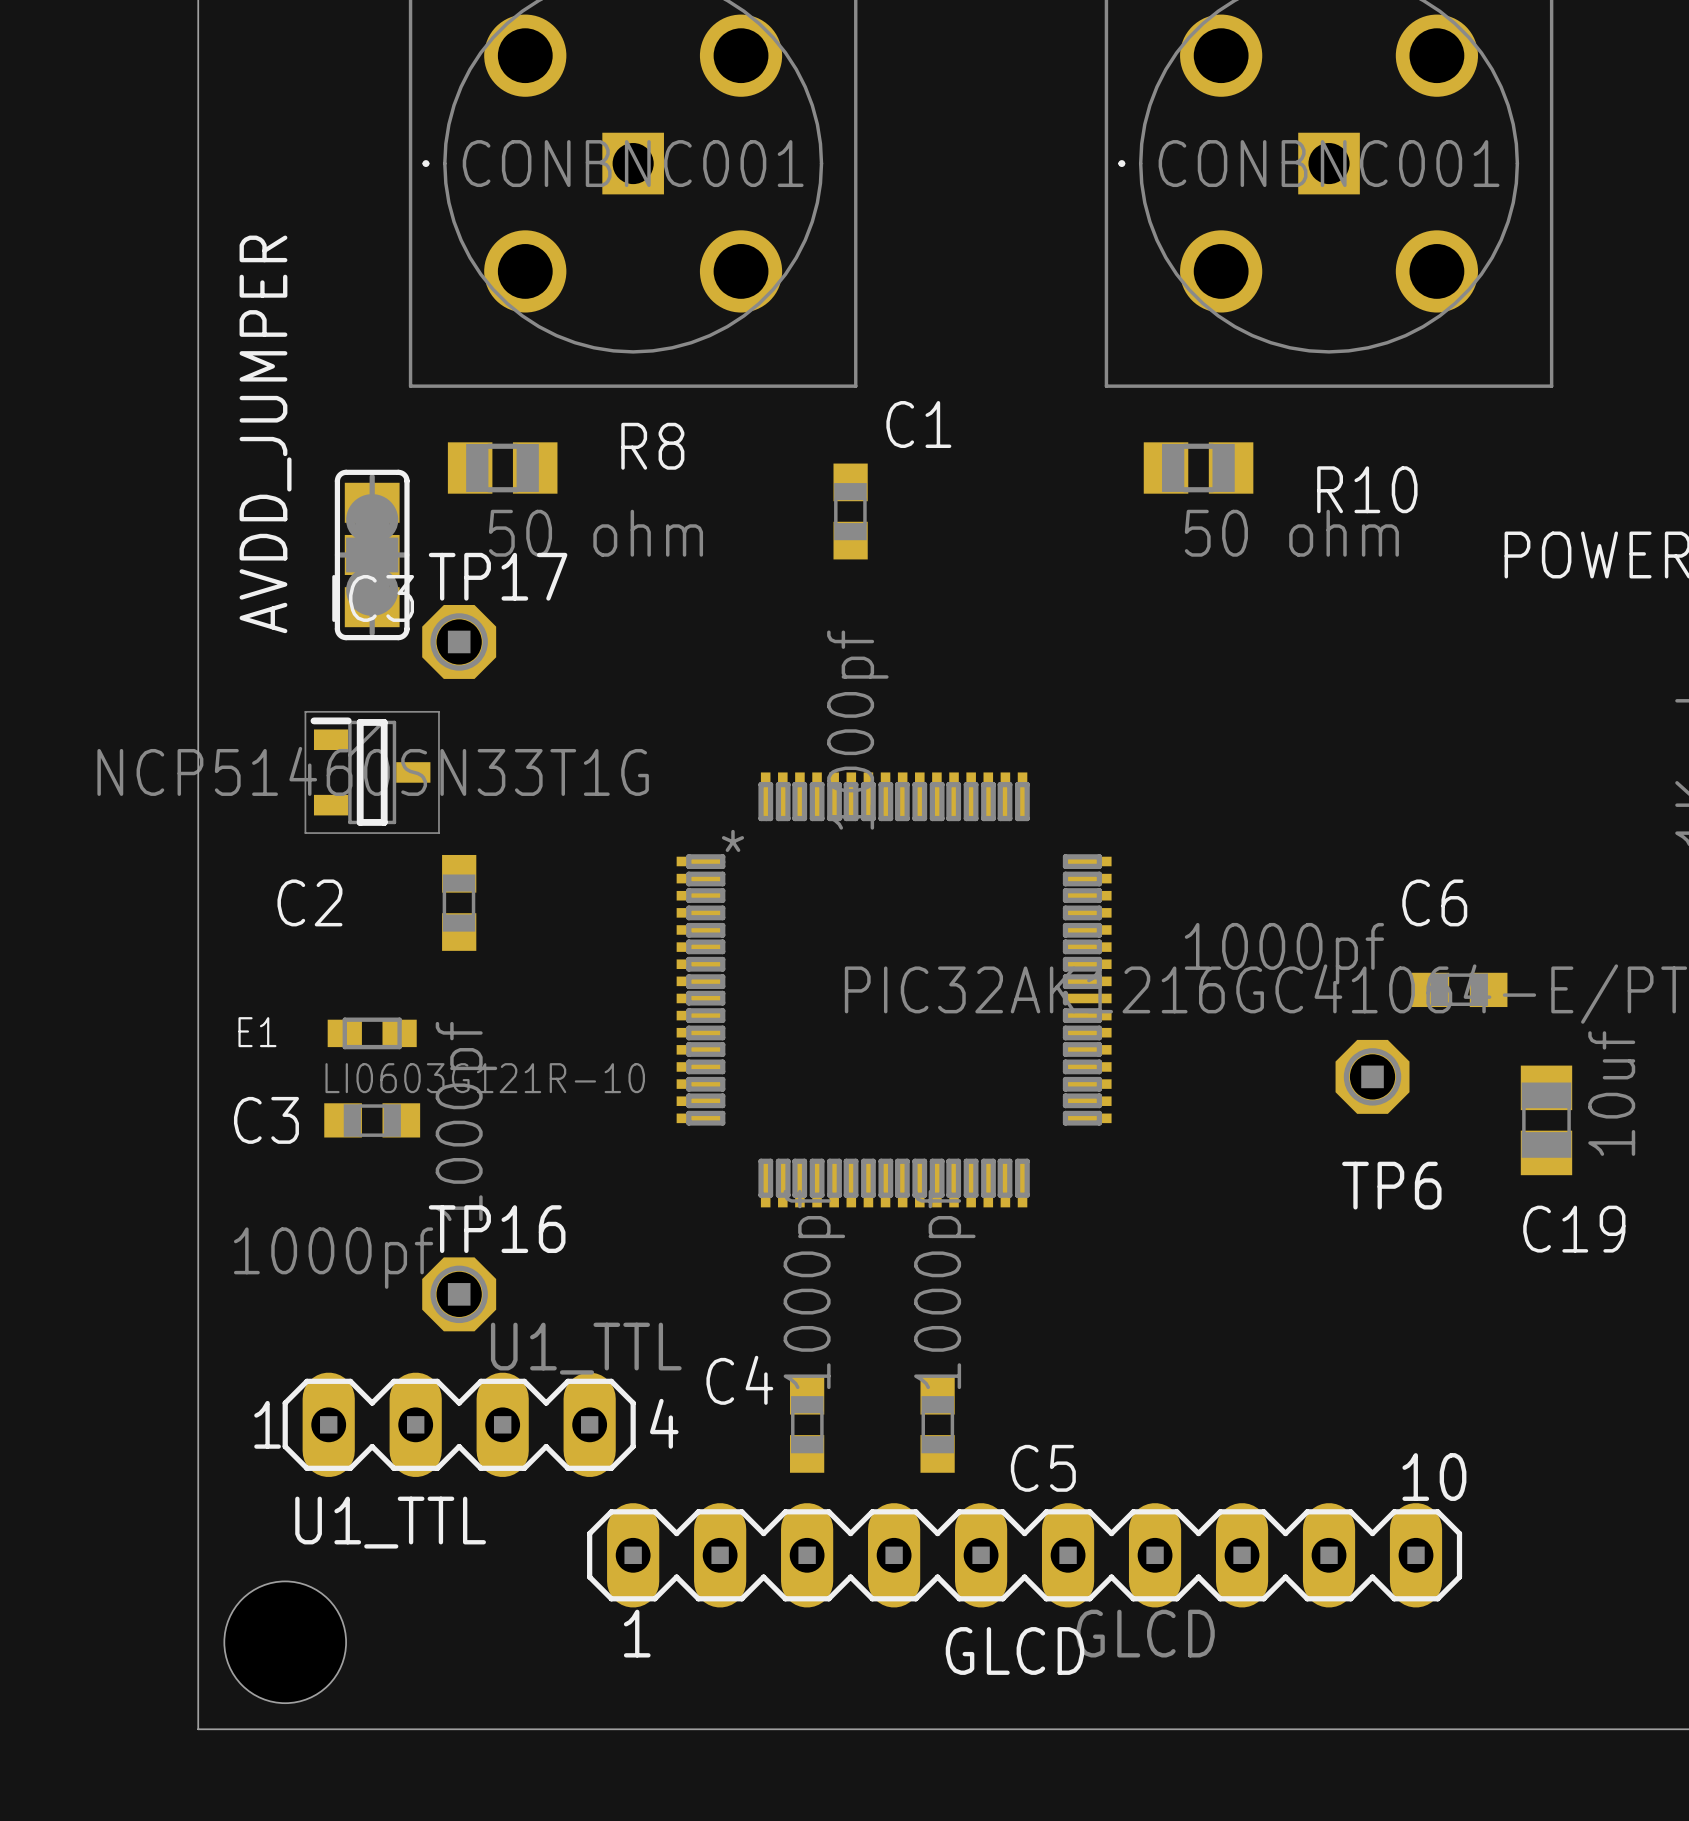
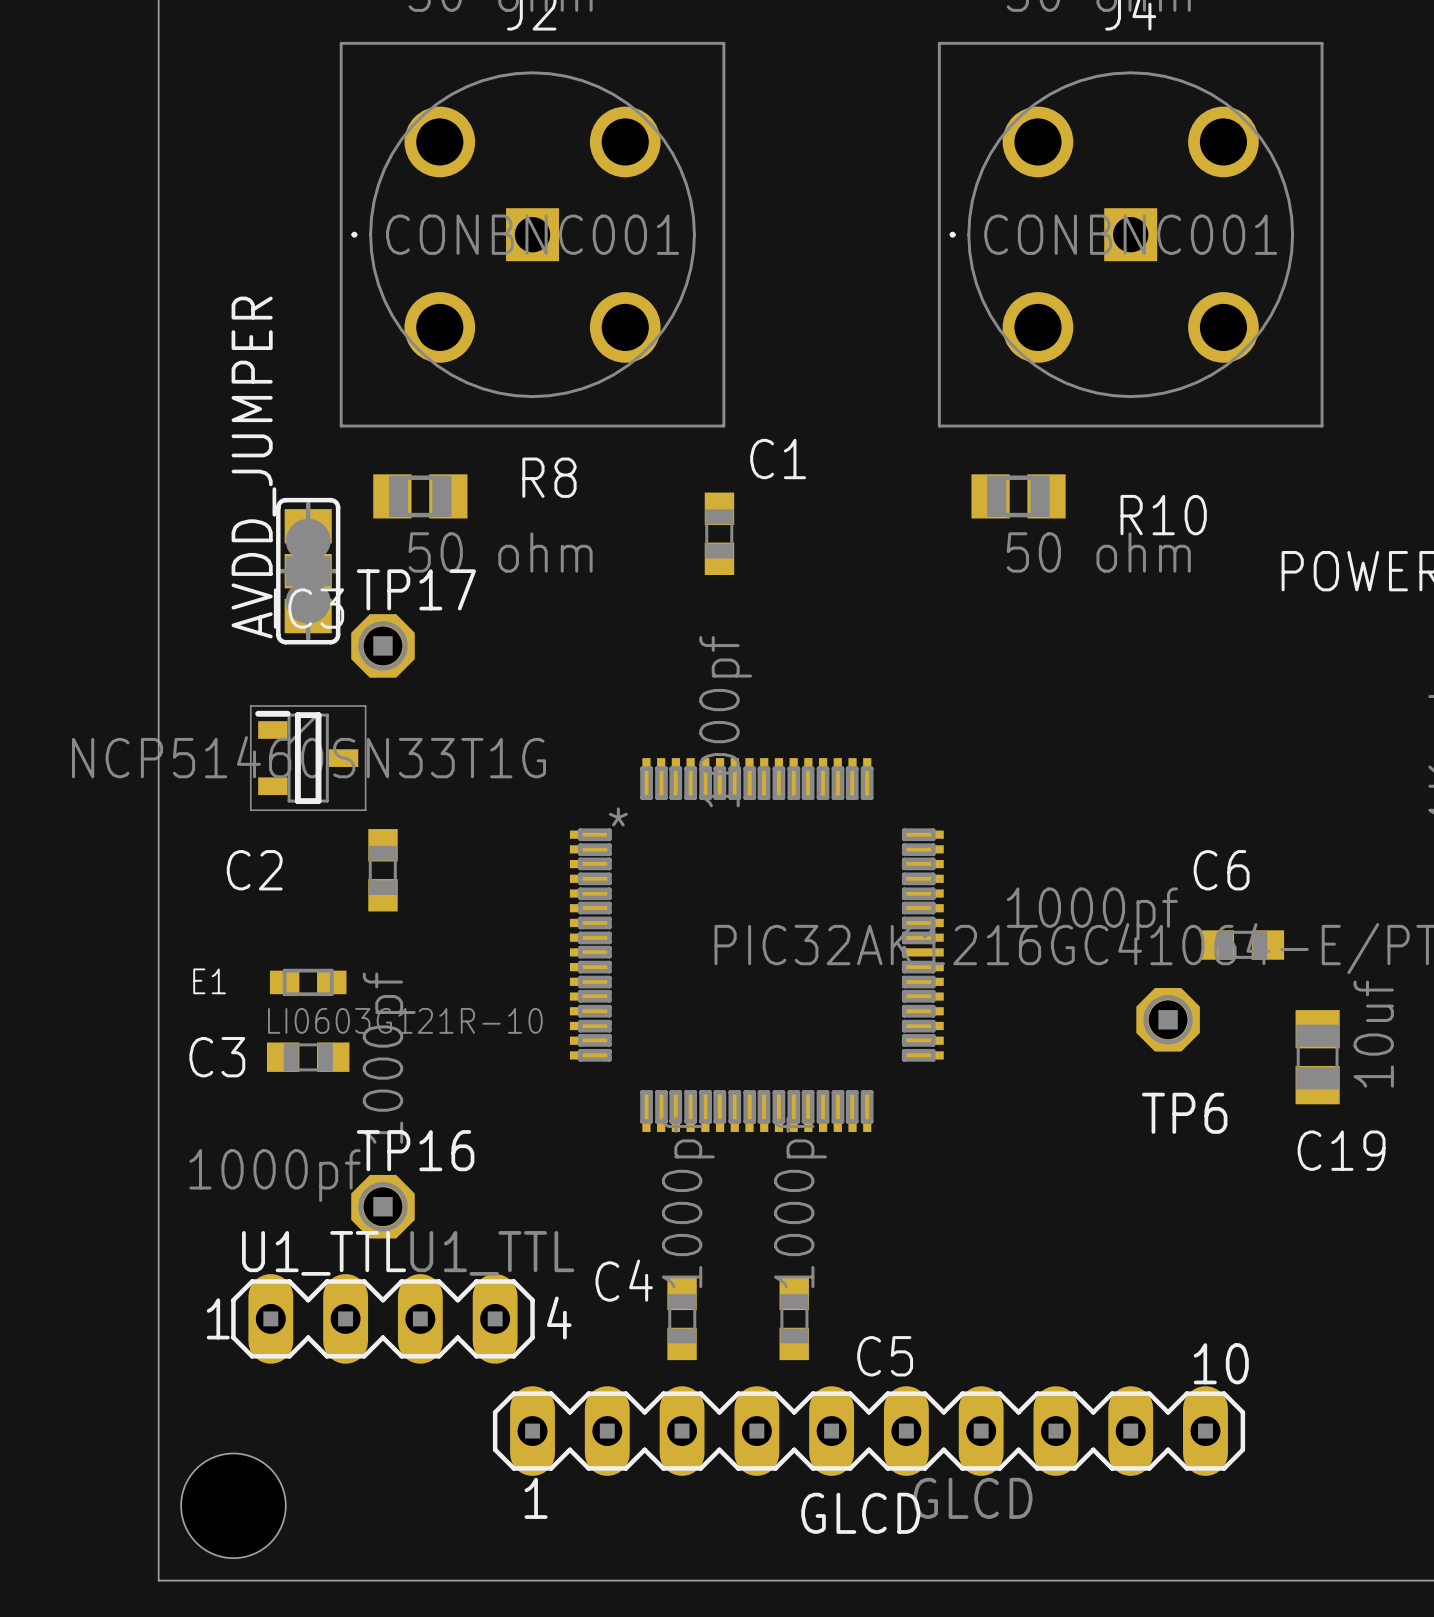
AVDD_JUMPER name position: AVDD_JUMPER (265, 434) -> AVDD_JUMPER (253, 467)
U1_TTL name position: U1_TTL (390, 1522) -> U1_TTL (324, 1253)

